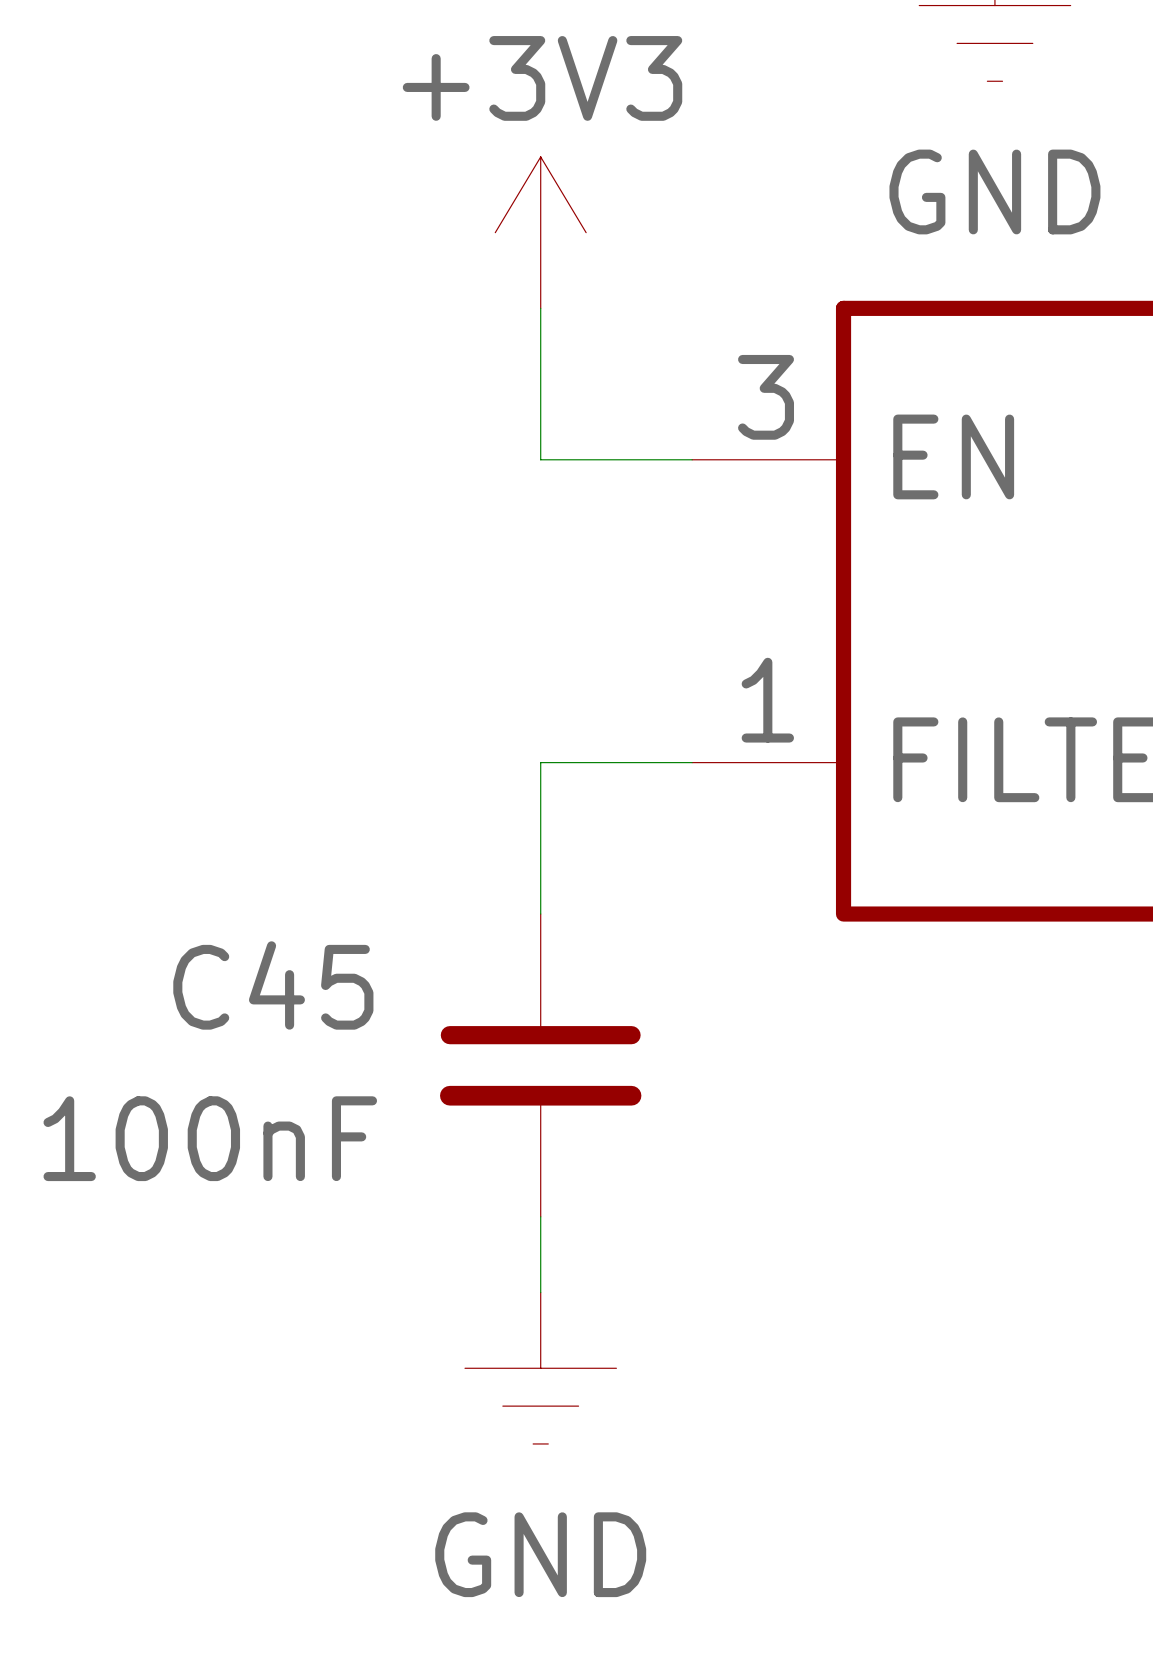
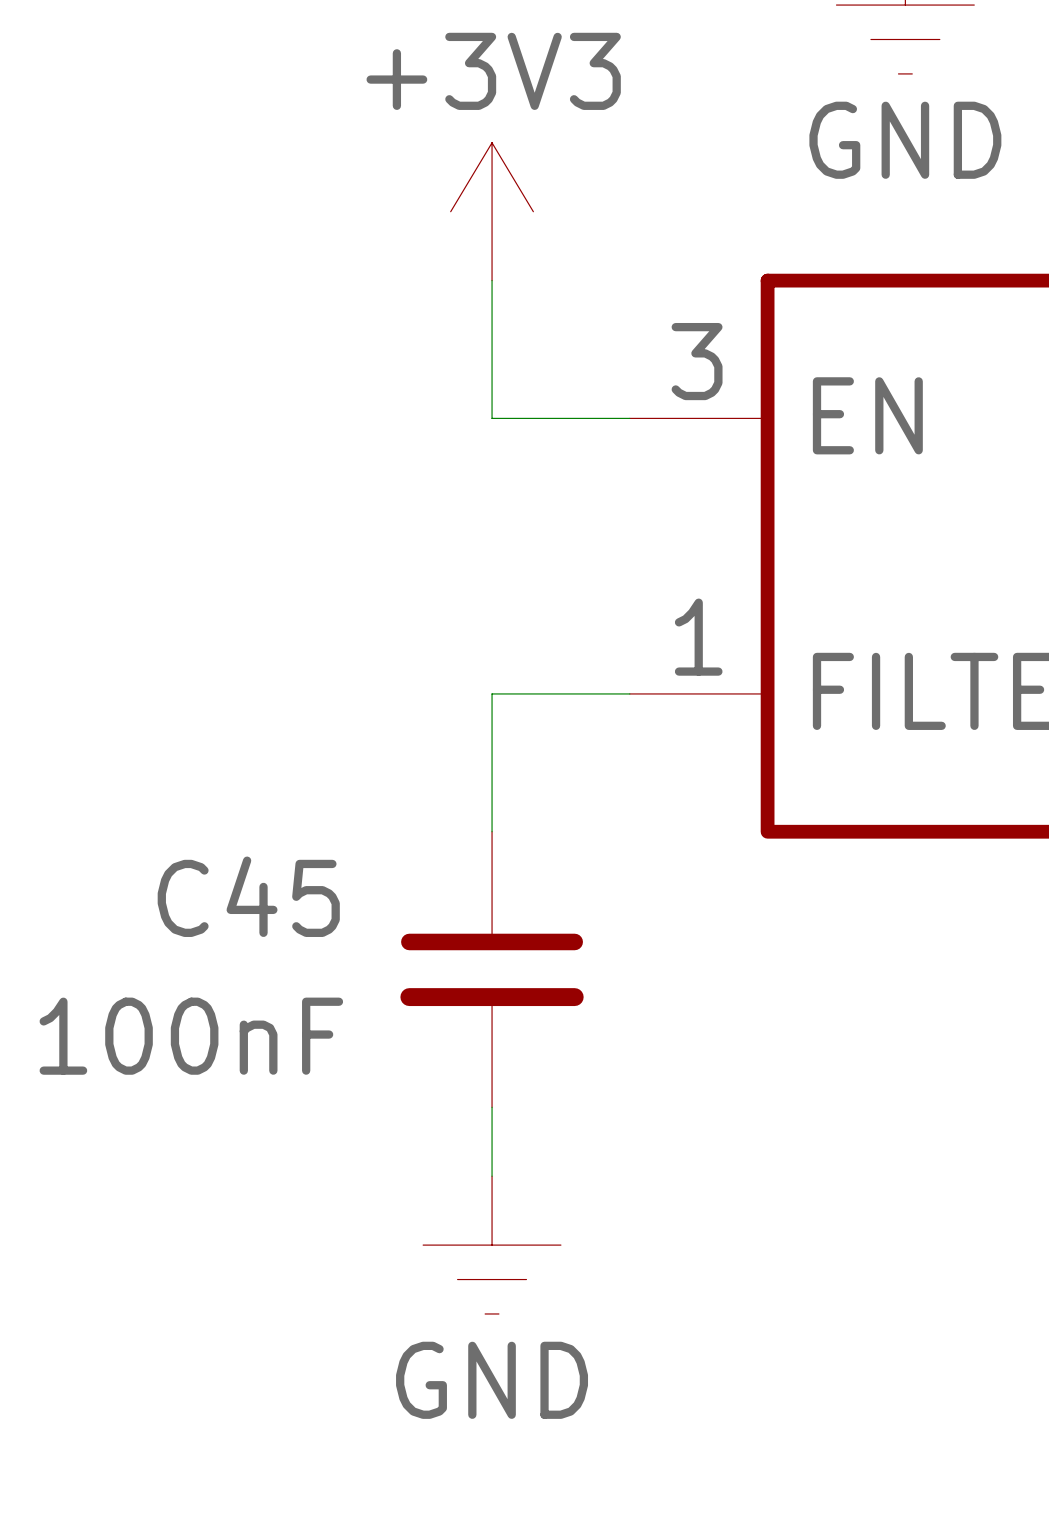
power symbol text position: GND (994, 191) -> GND (905, 140)
power symbol text position: GND (540, 1554) -> GND (492, 1380)

